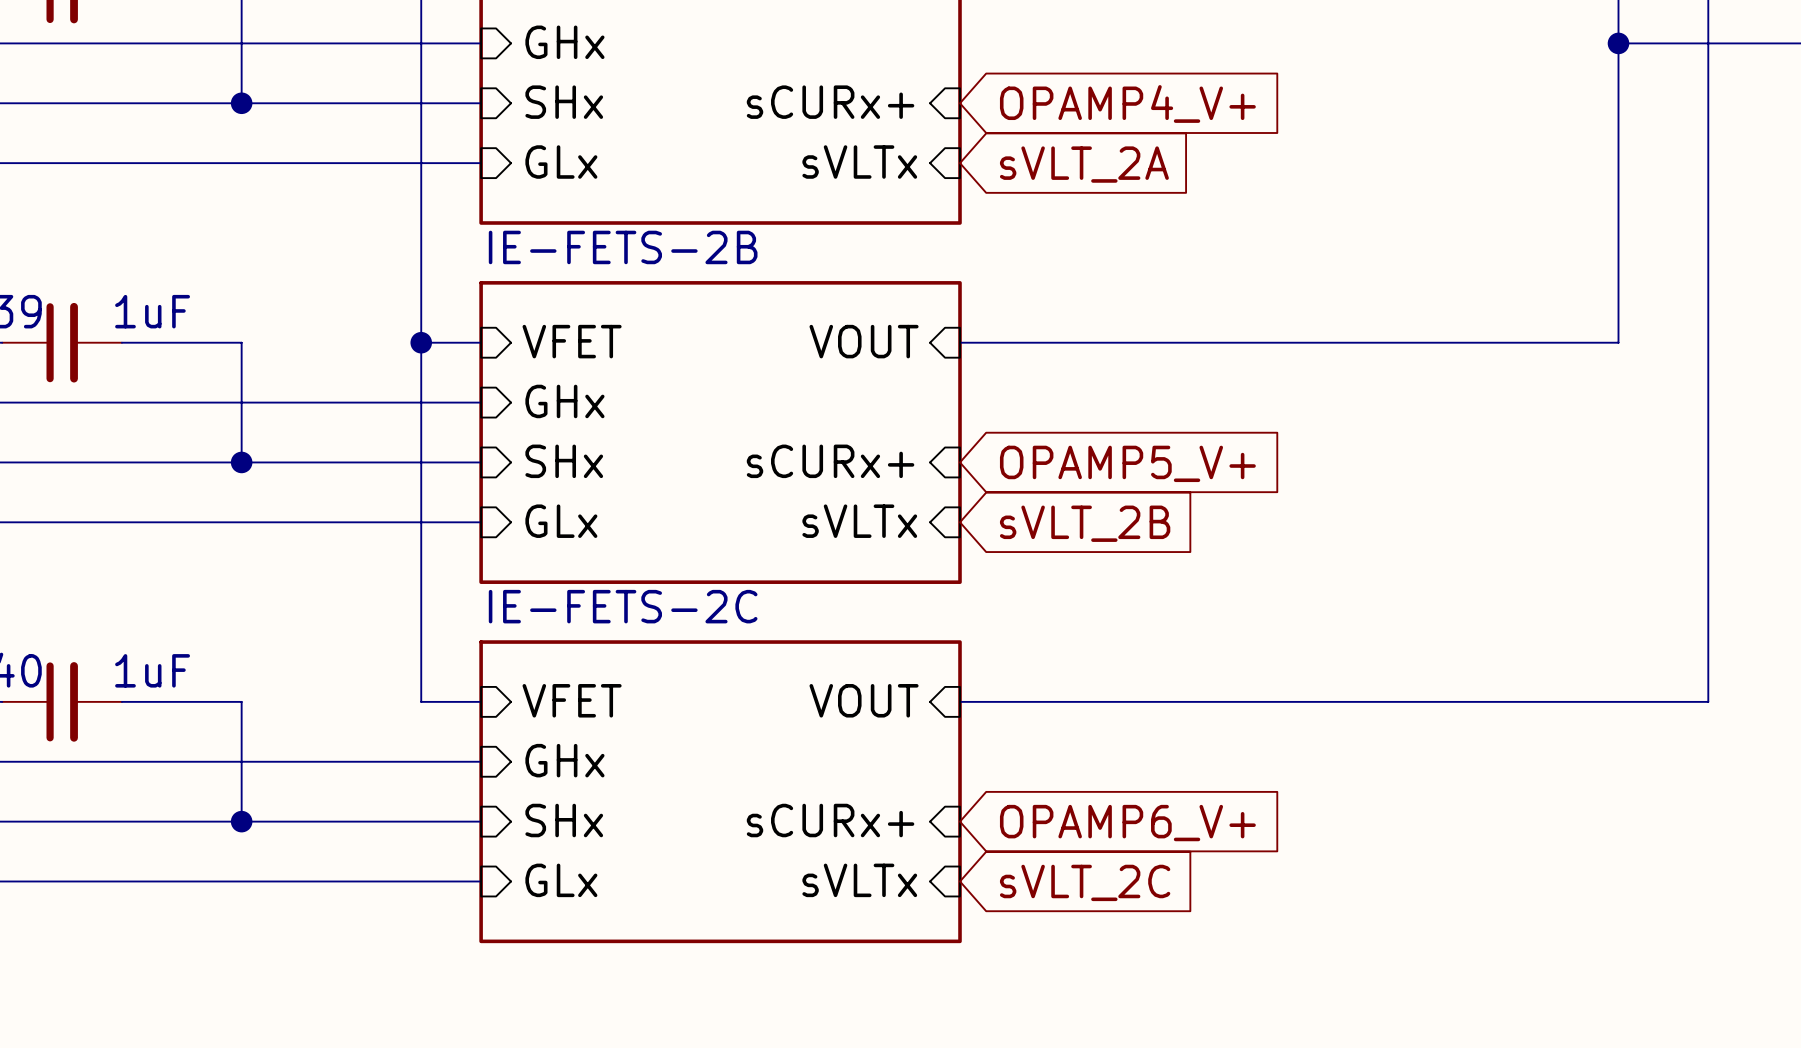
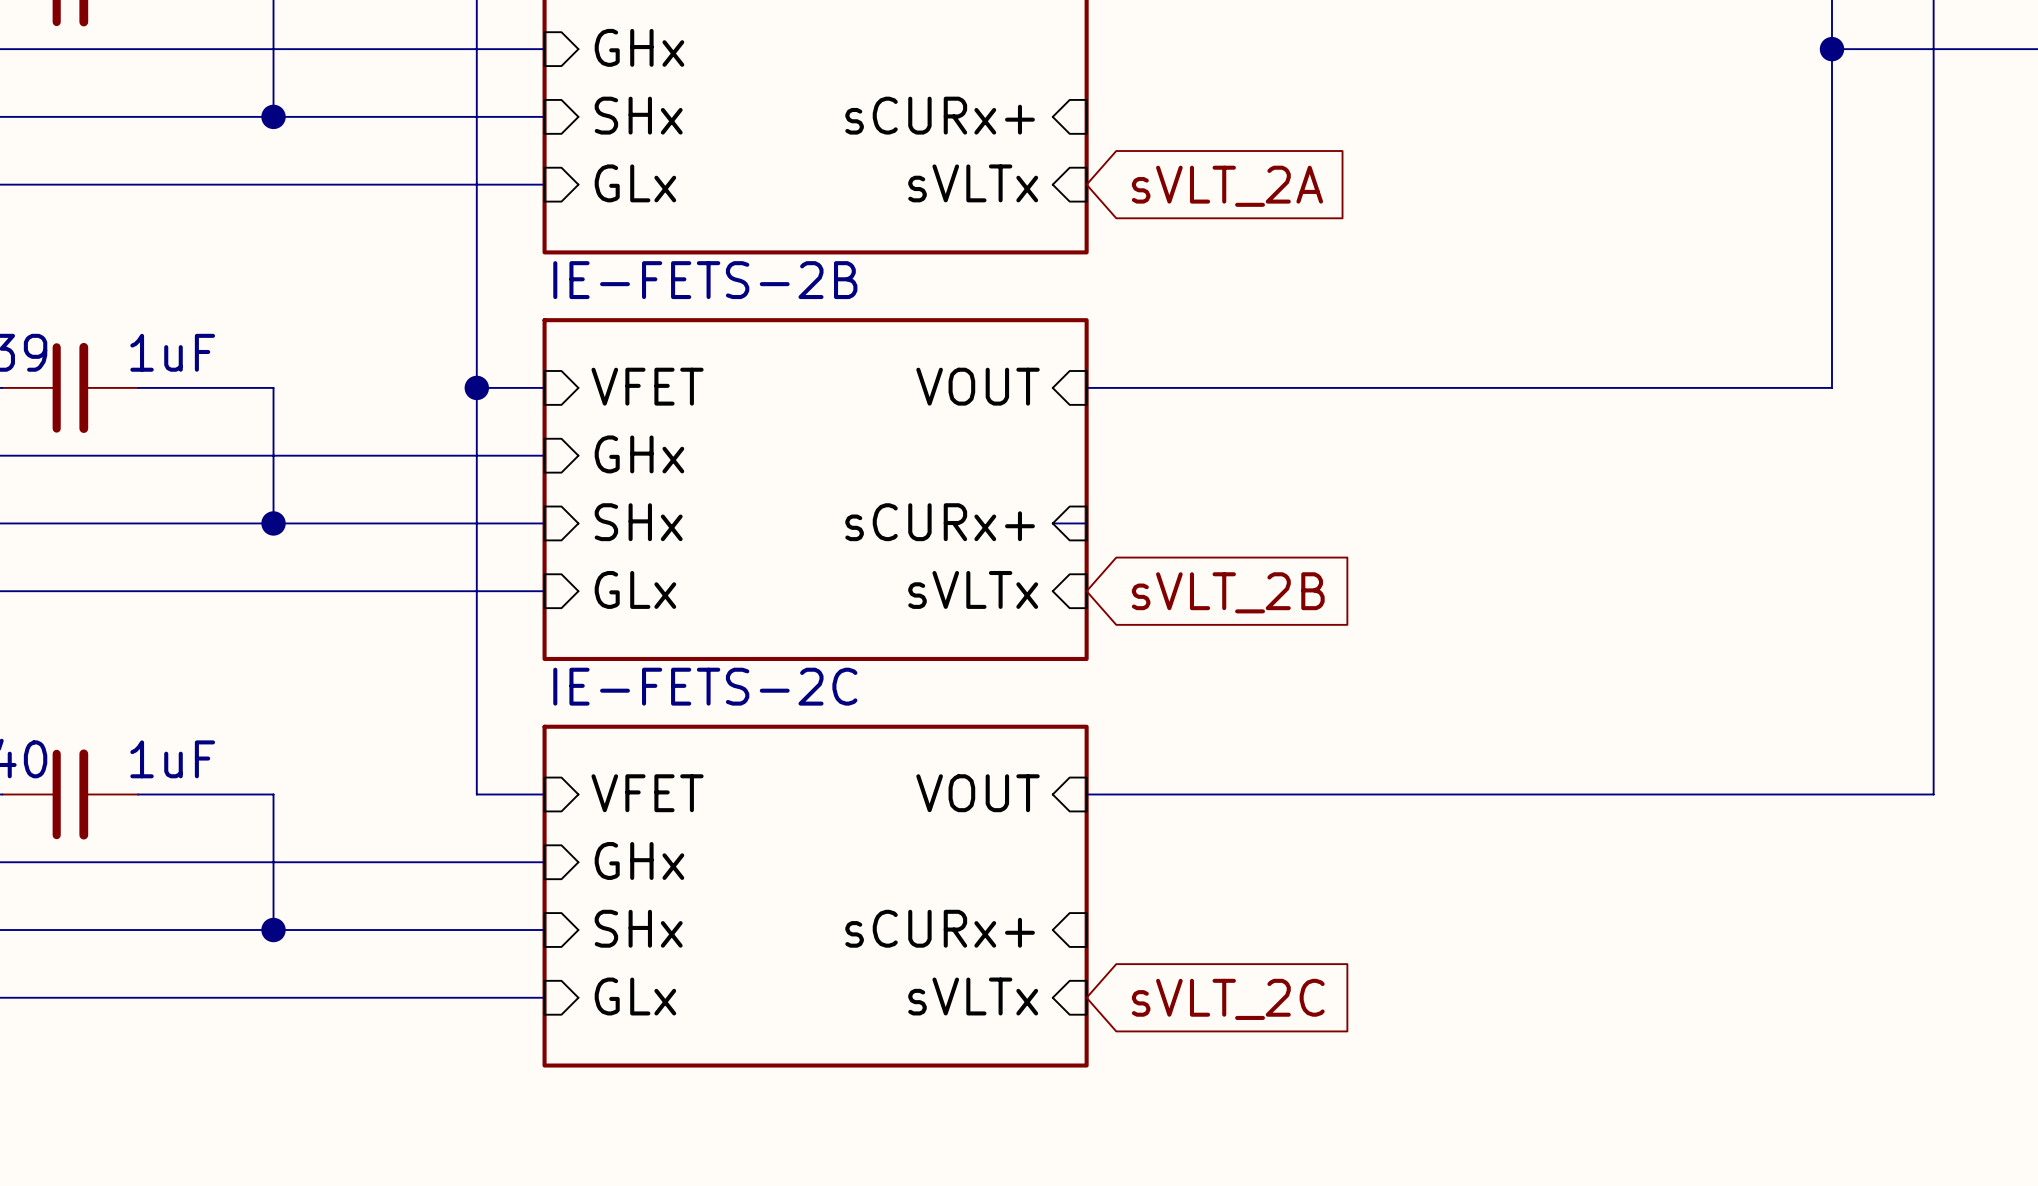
global label: OPAMP4_V+ (1127, 103) -> none
wire: none -> (1052, 523) (1086, 523)
global label: OPAMP5_V+ (1127, 463) -> none
global label: OPAMP6_V+ (1127, 823) -> none

